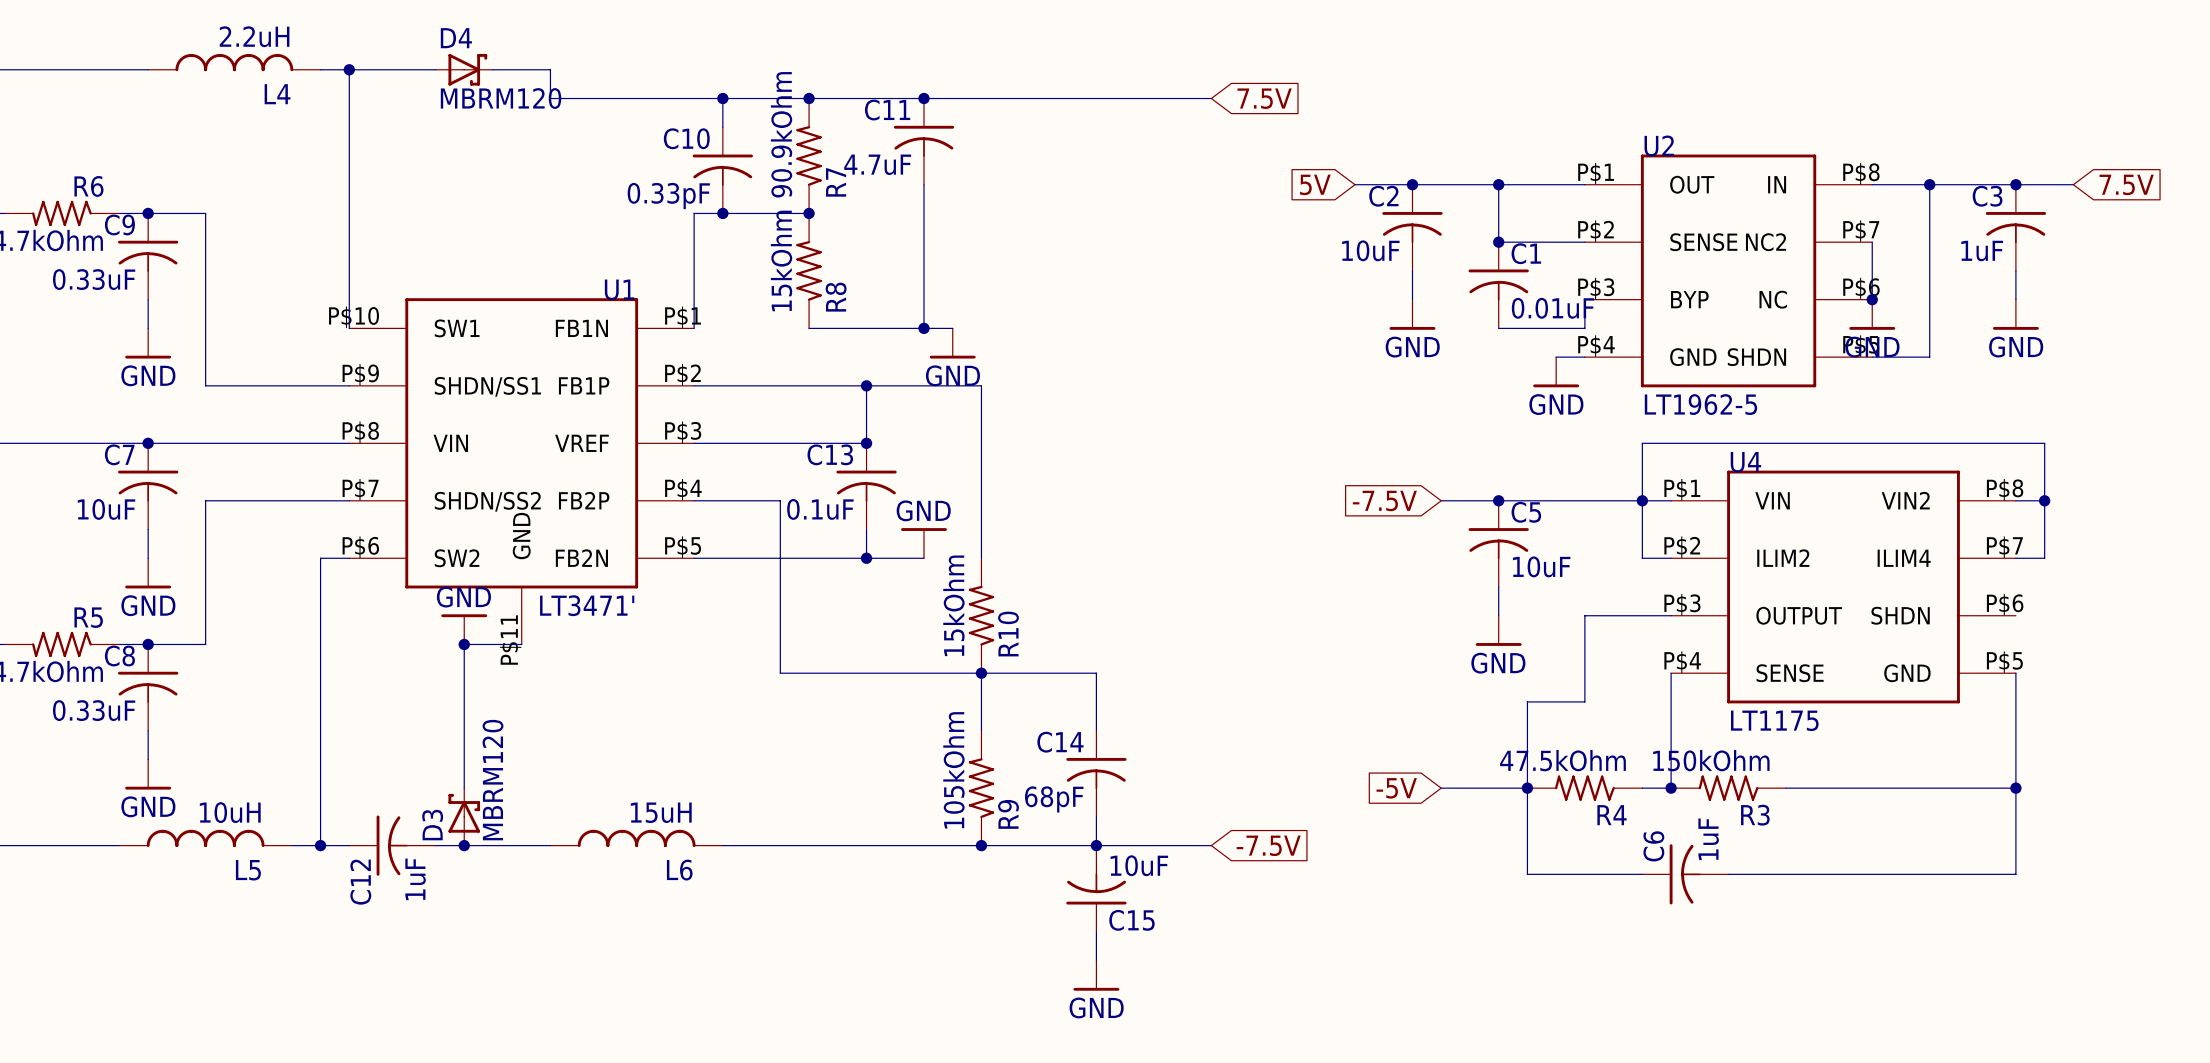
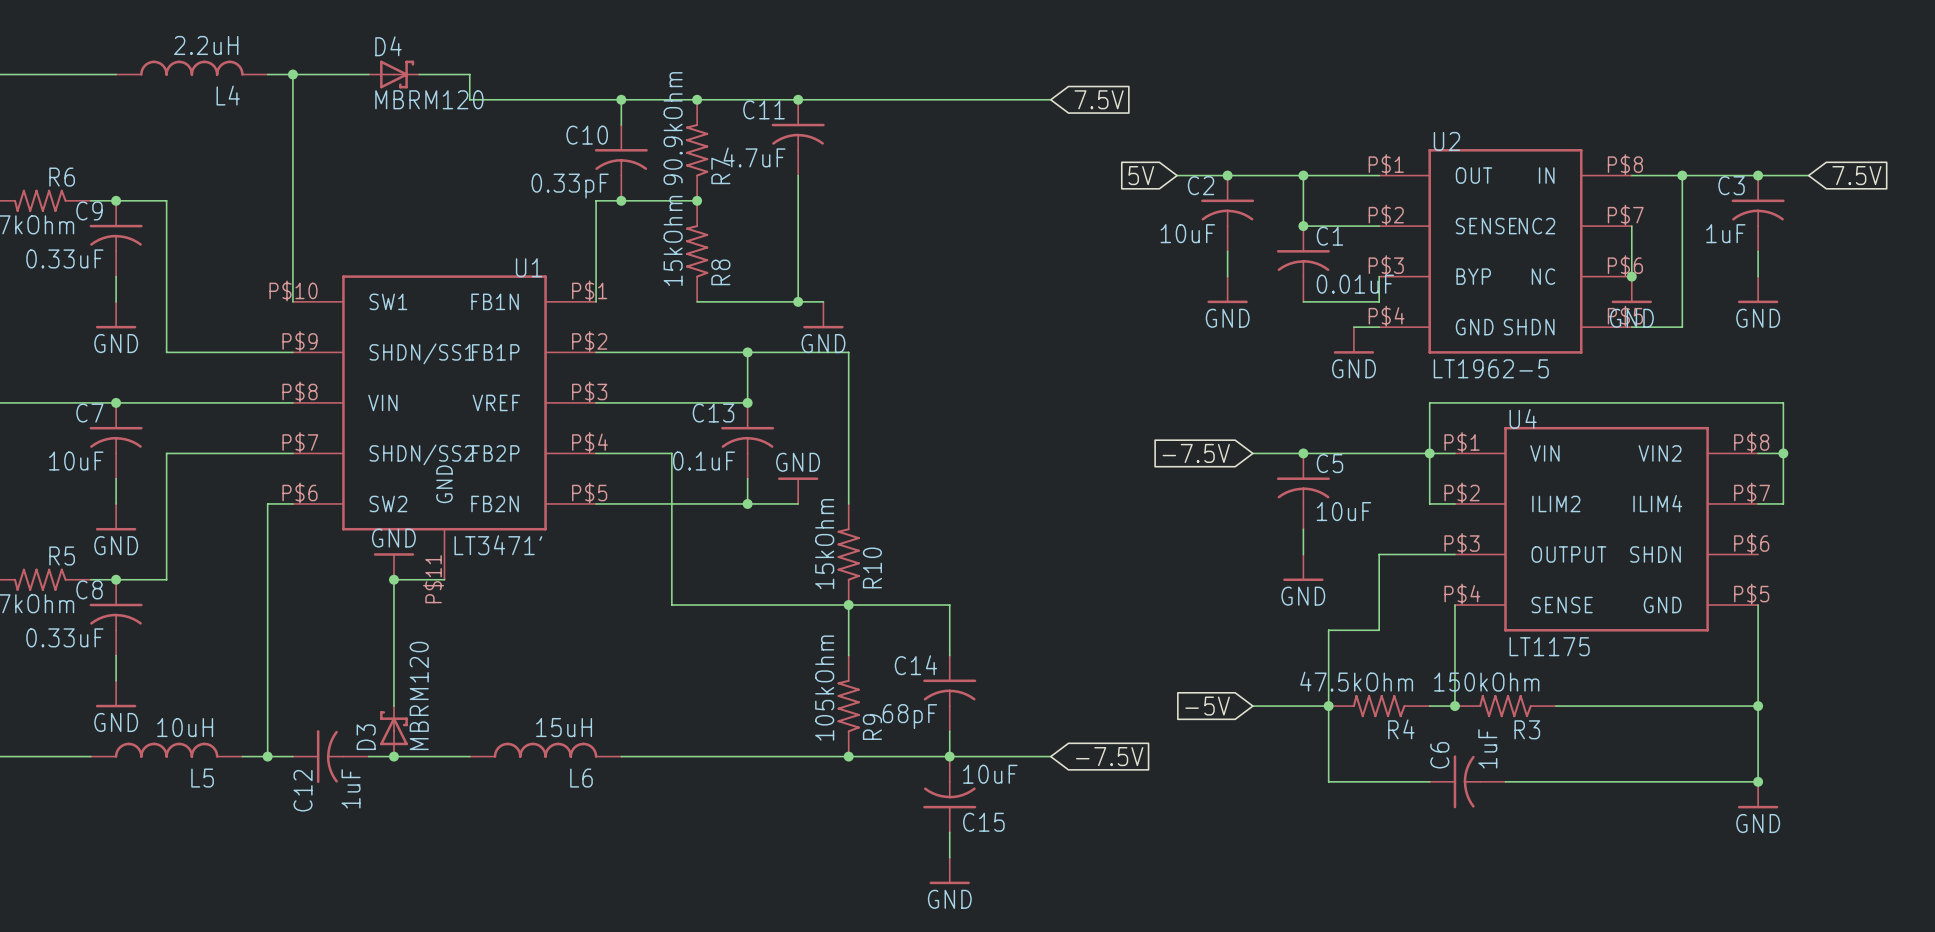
junction: none -> (1758, 781)
power symbol: none -> GND (1758, 795)

